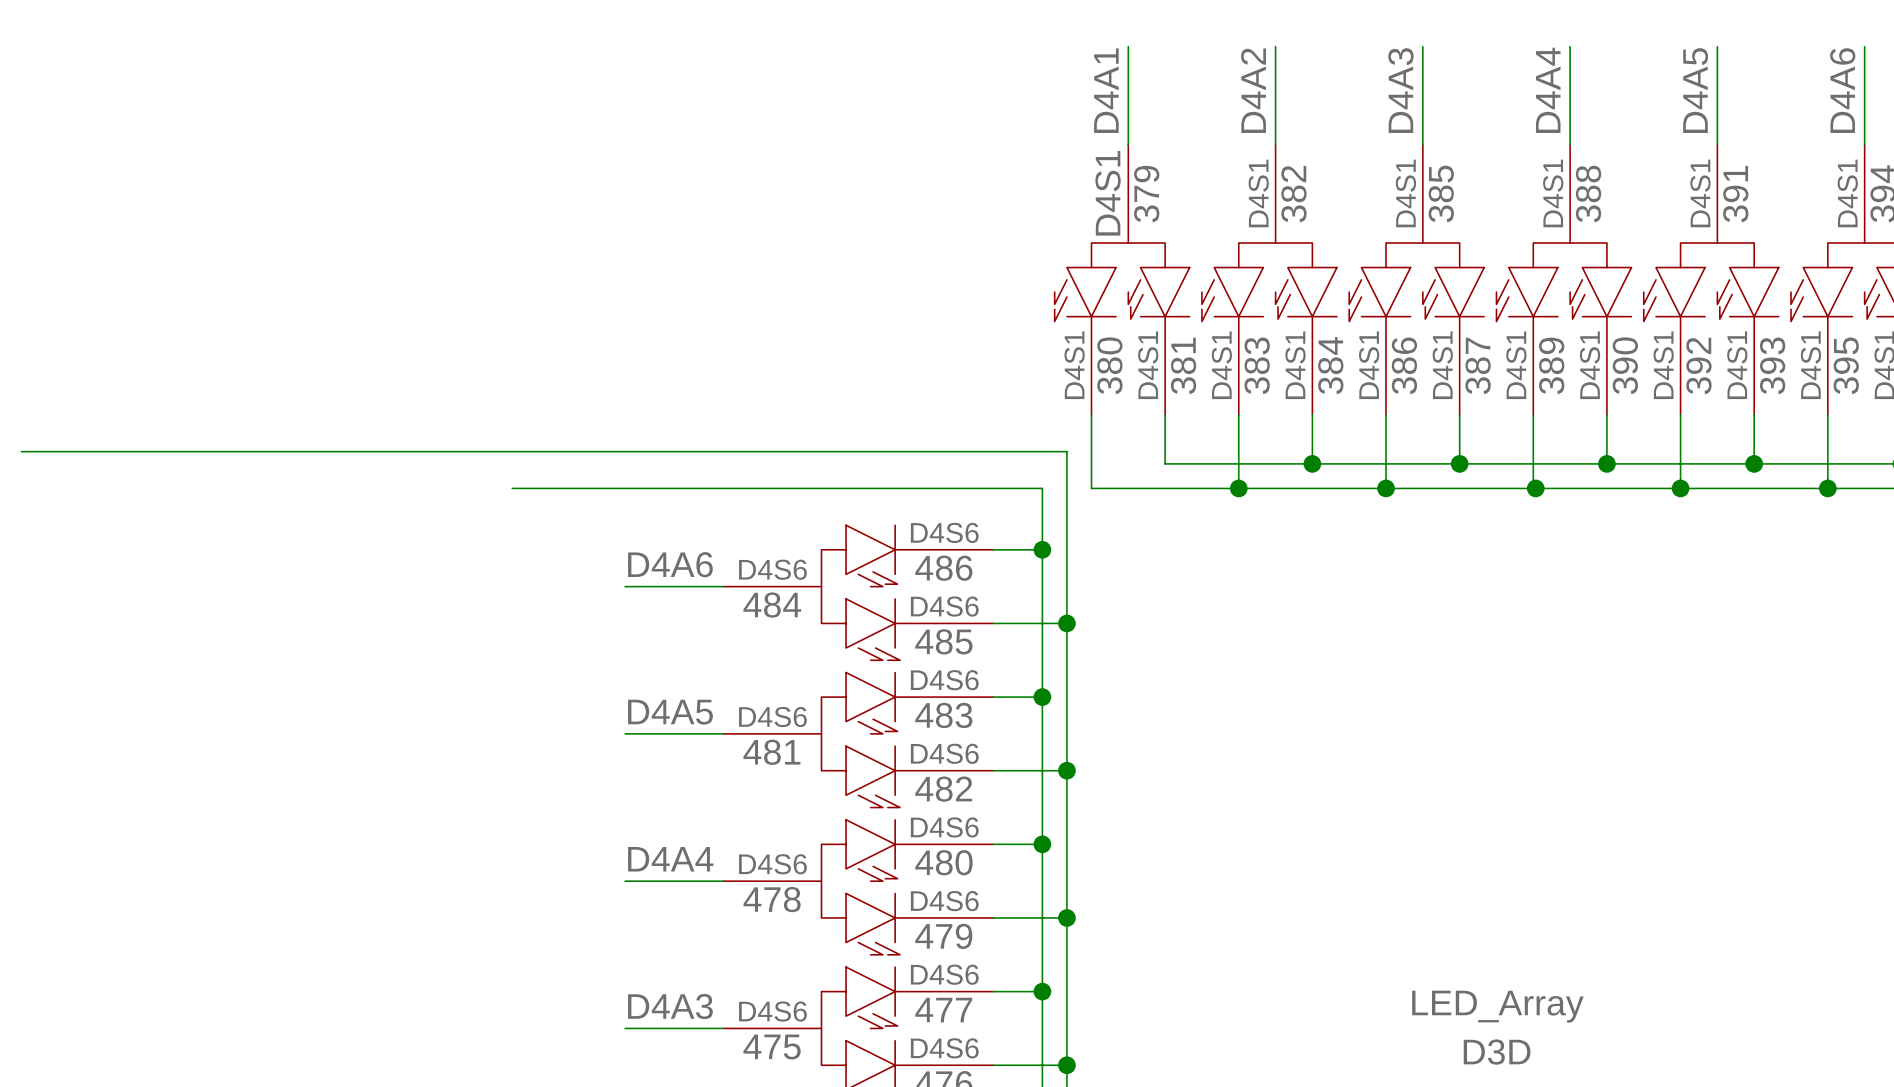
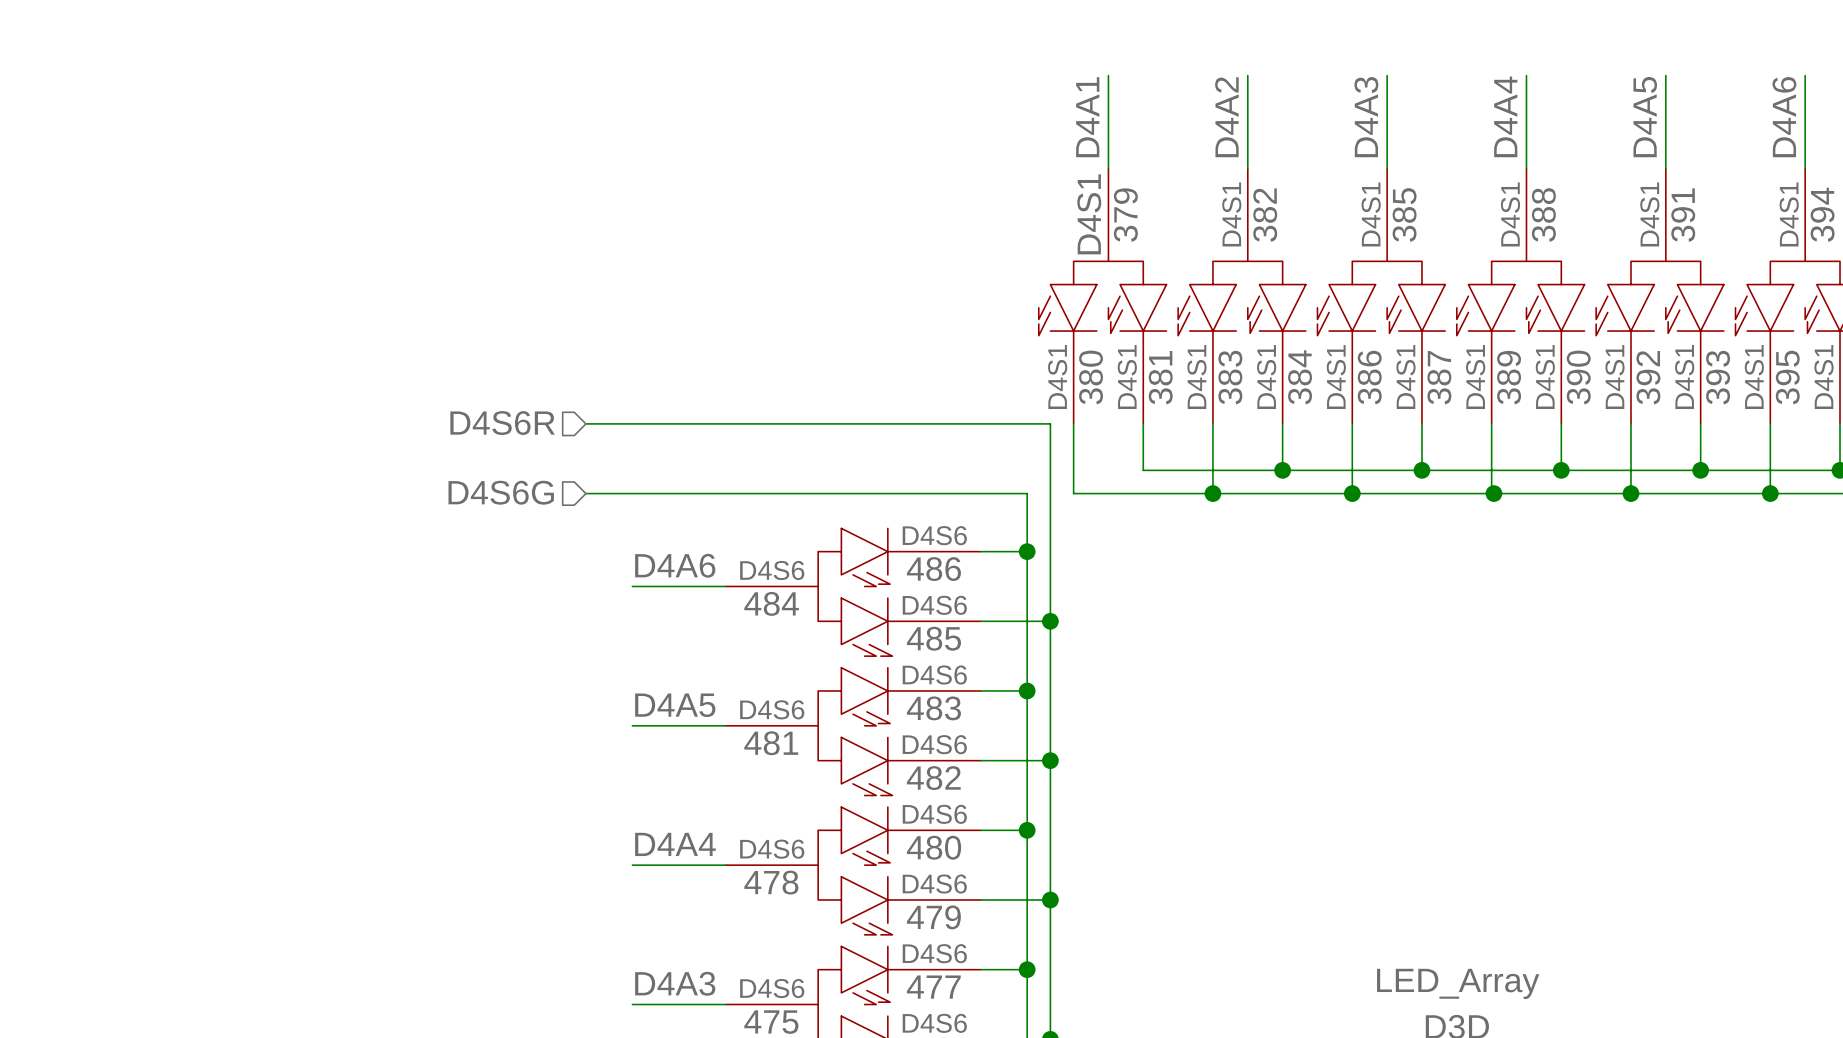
hierarchical label: none -> D4S6R (502, 423)
wire: (21, 451) (1066, 451) -> (585, 423) (1050, 423) (1050, 458)
hierarchical label: none -> D4S6G (501, 492)
wire: (512, 488) (576, 488) -> none

